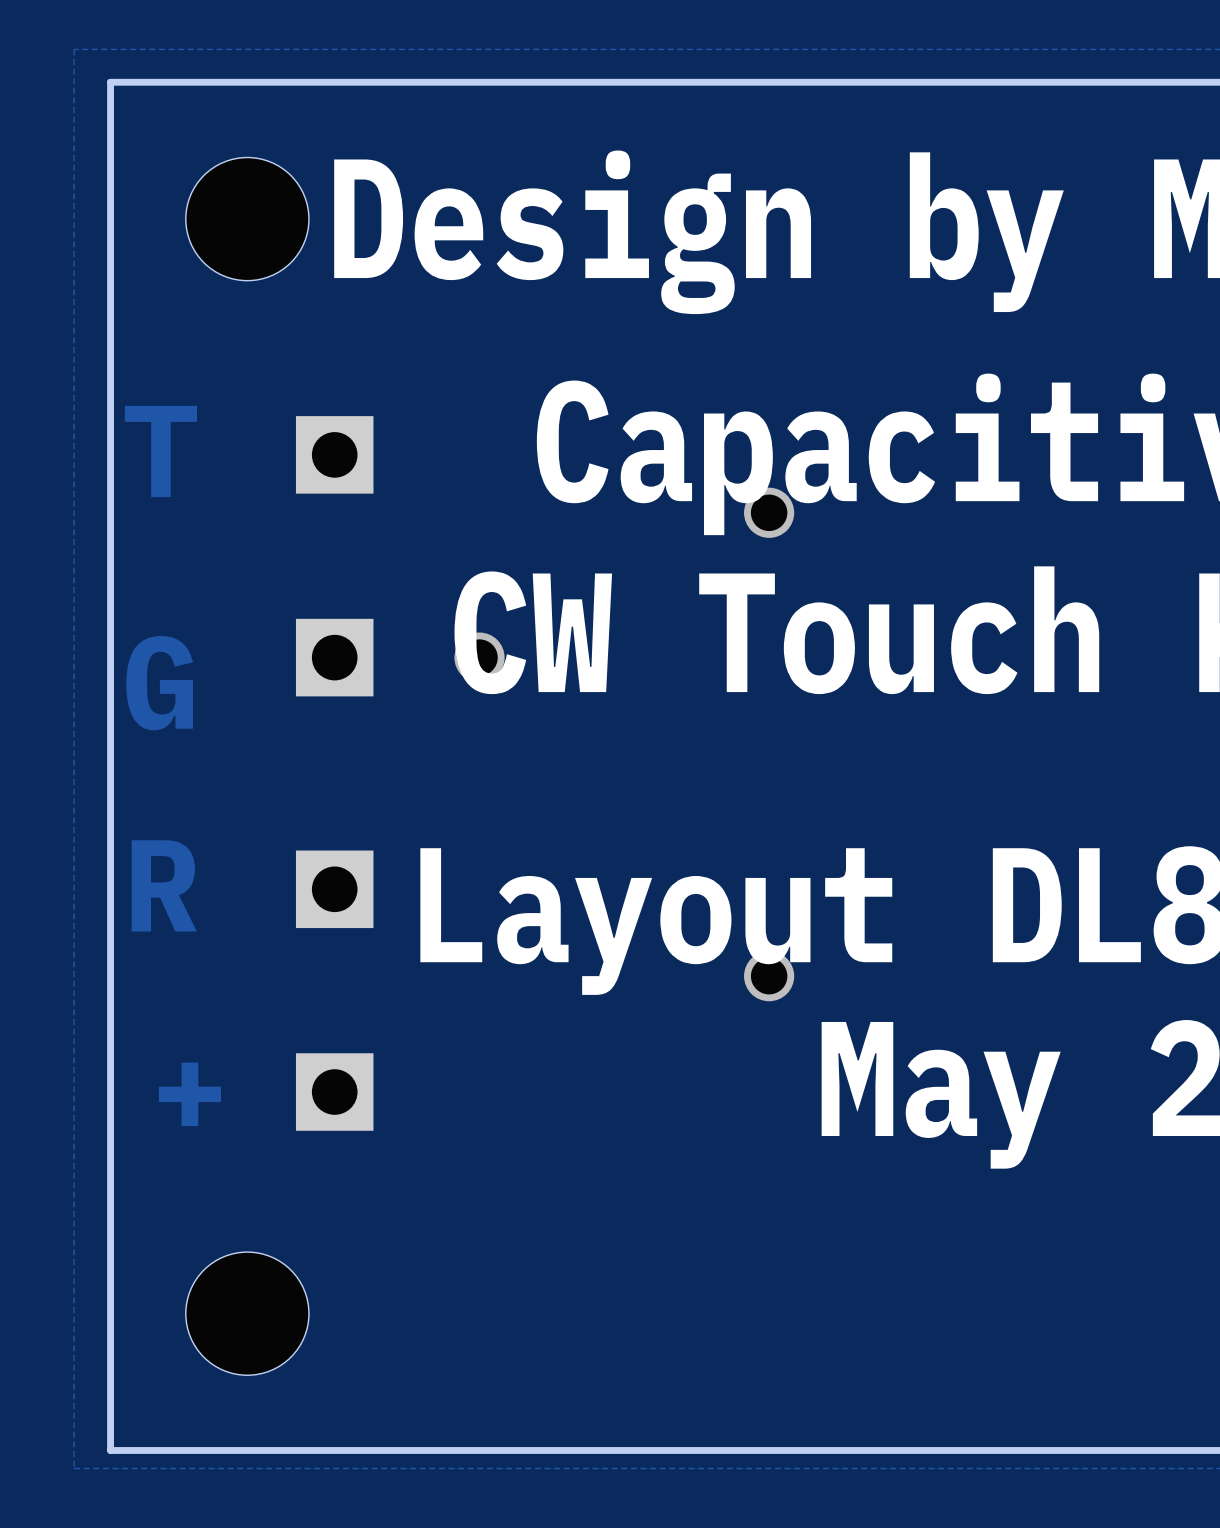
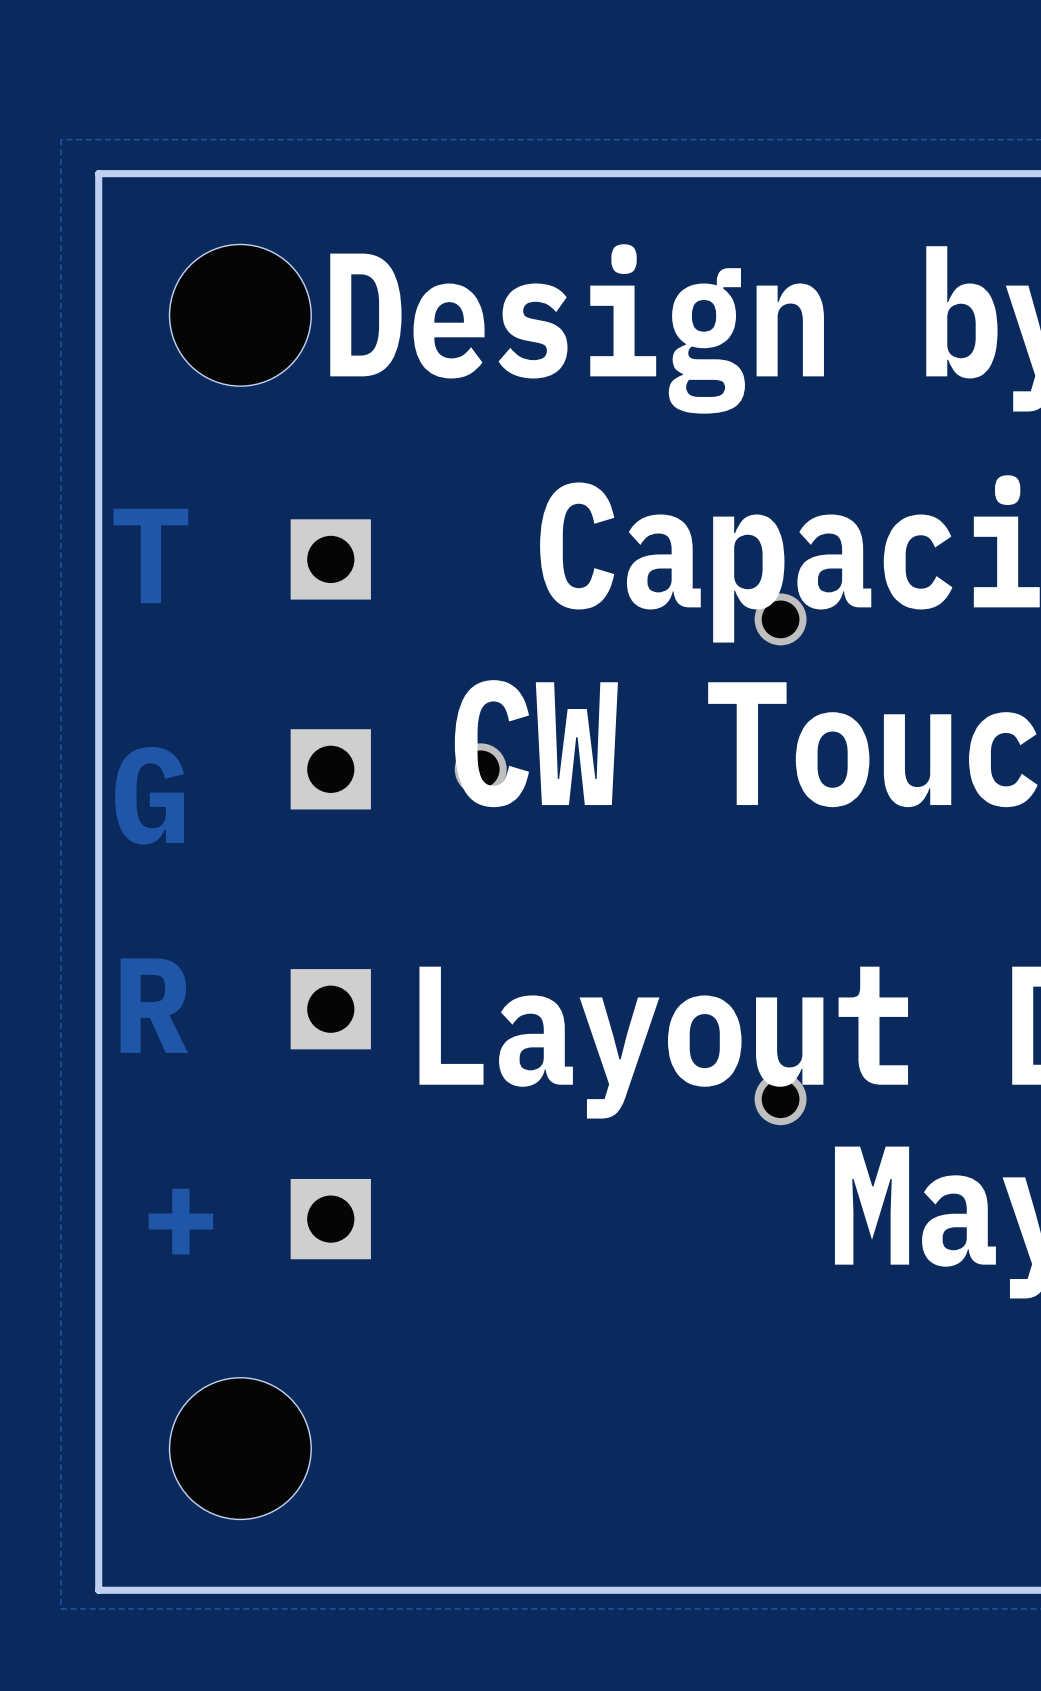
part footprint: [185, 157, 309, 281] -> [169, 244, 312, 387]
part footprint: [185, 1252, 309, 1376] -> [169, 1377, 312, 1520]

